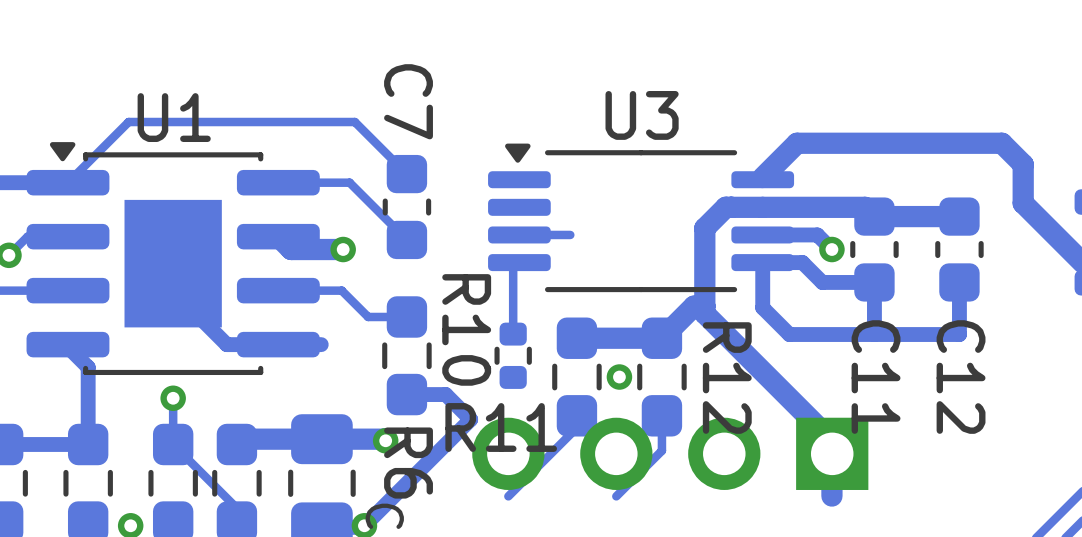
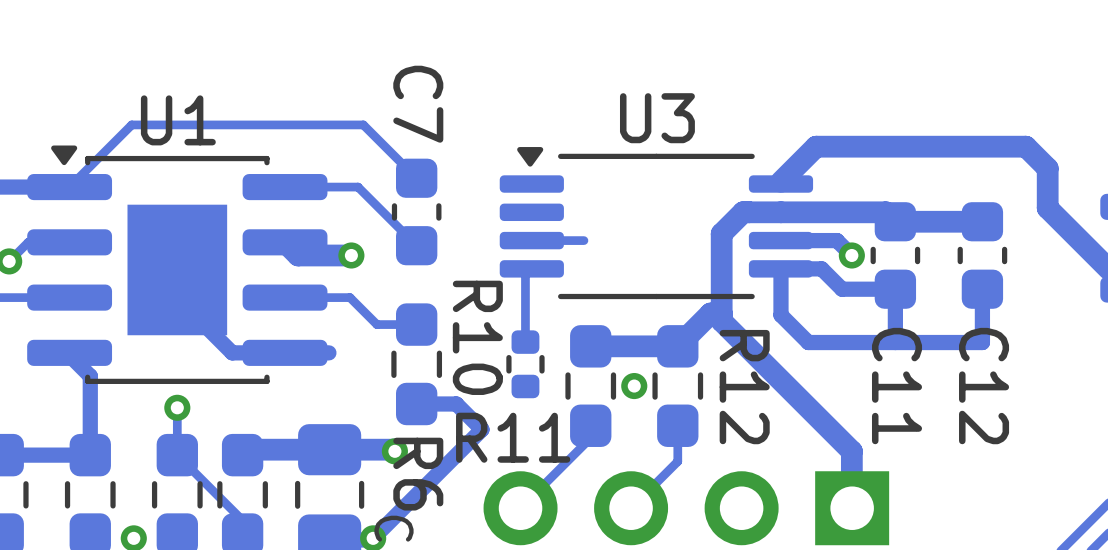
part position: (670, 453) -> (686, 508)

